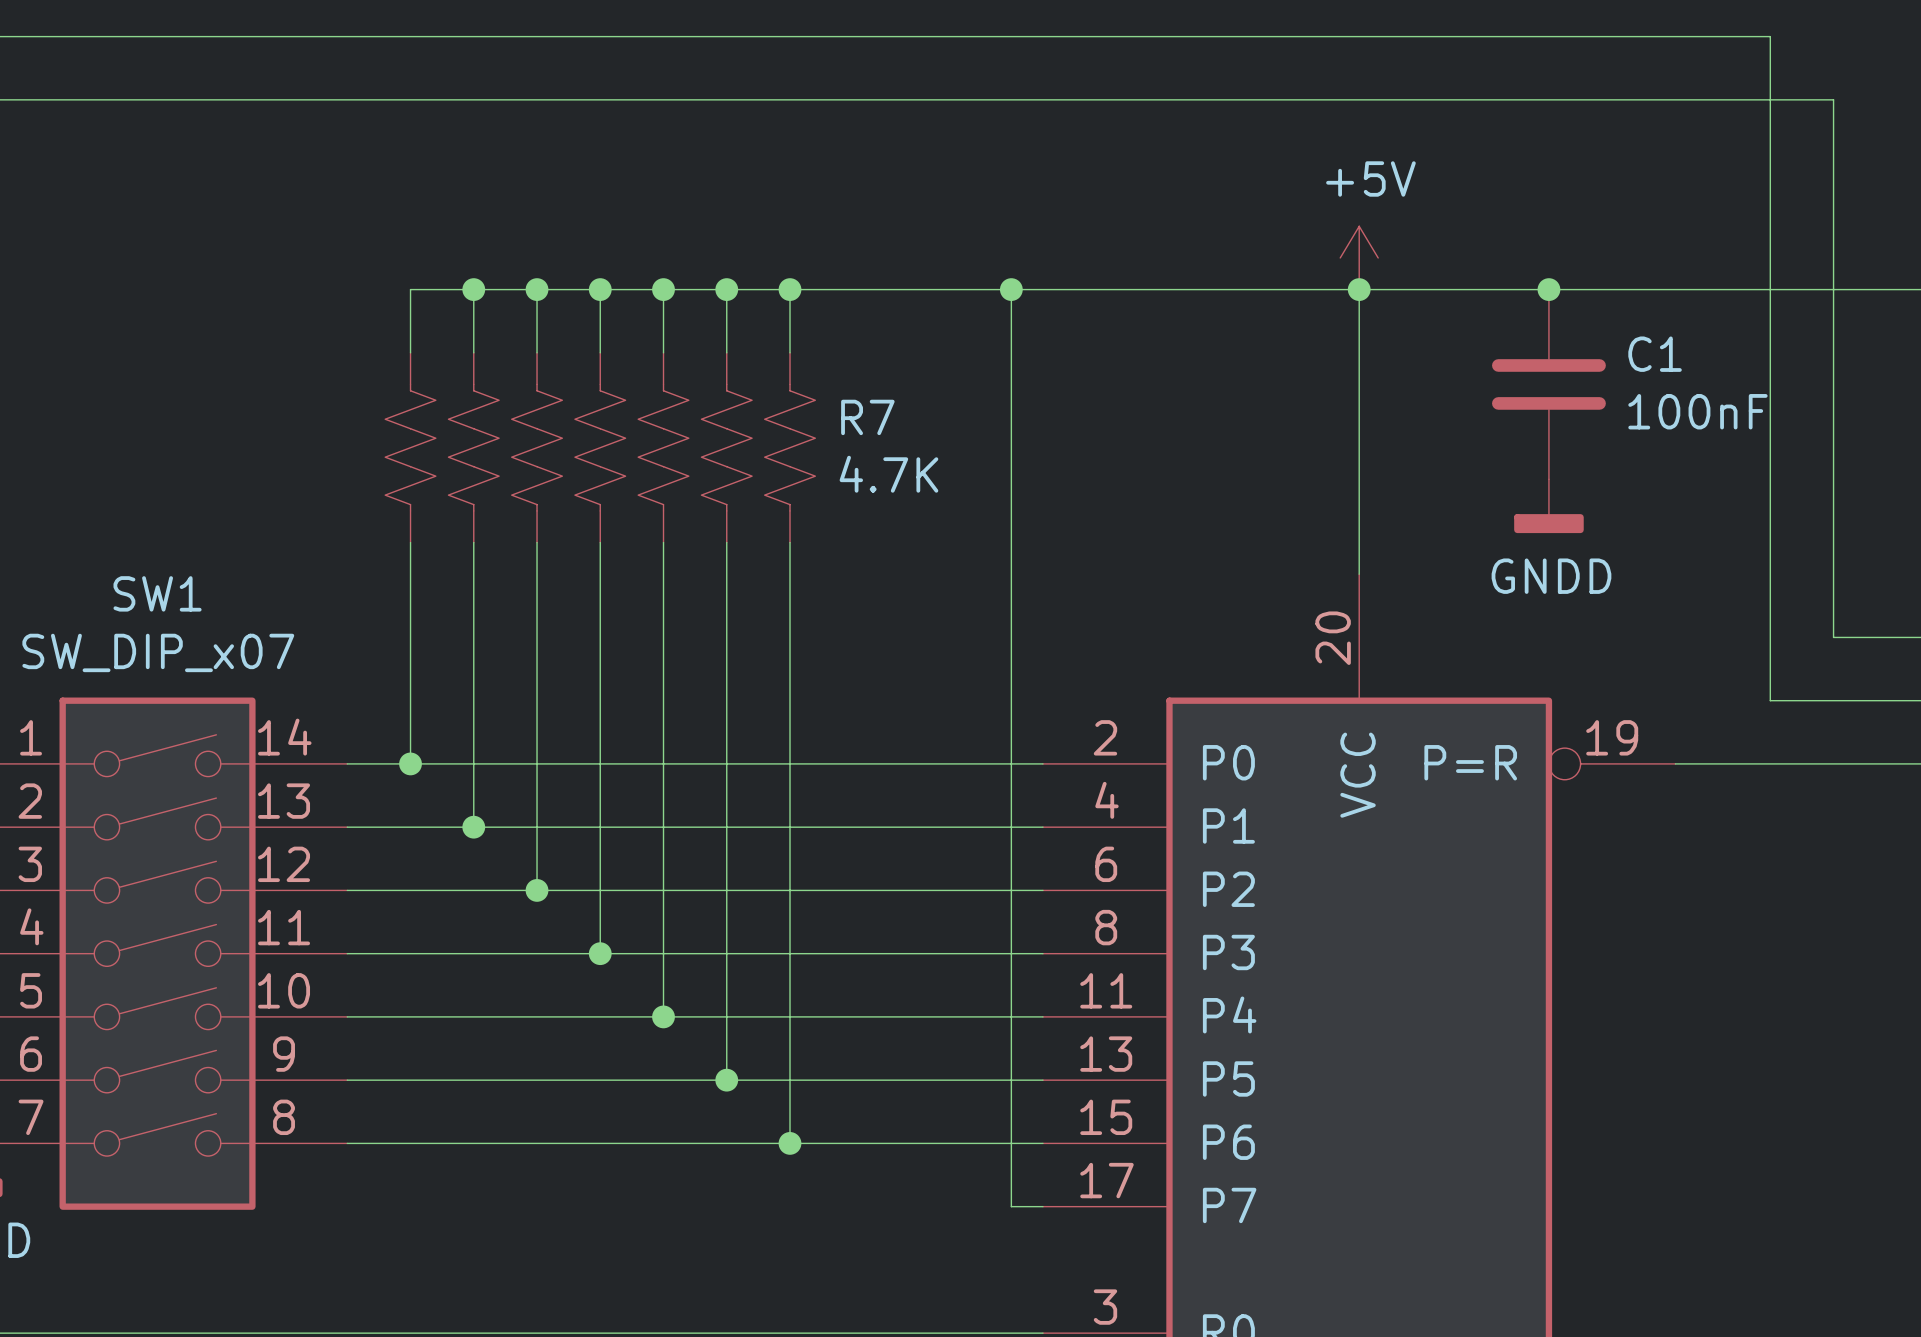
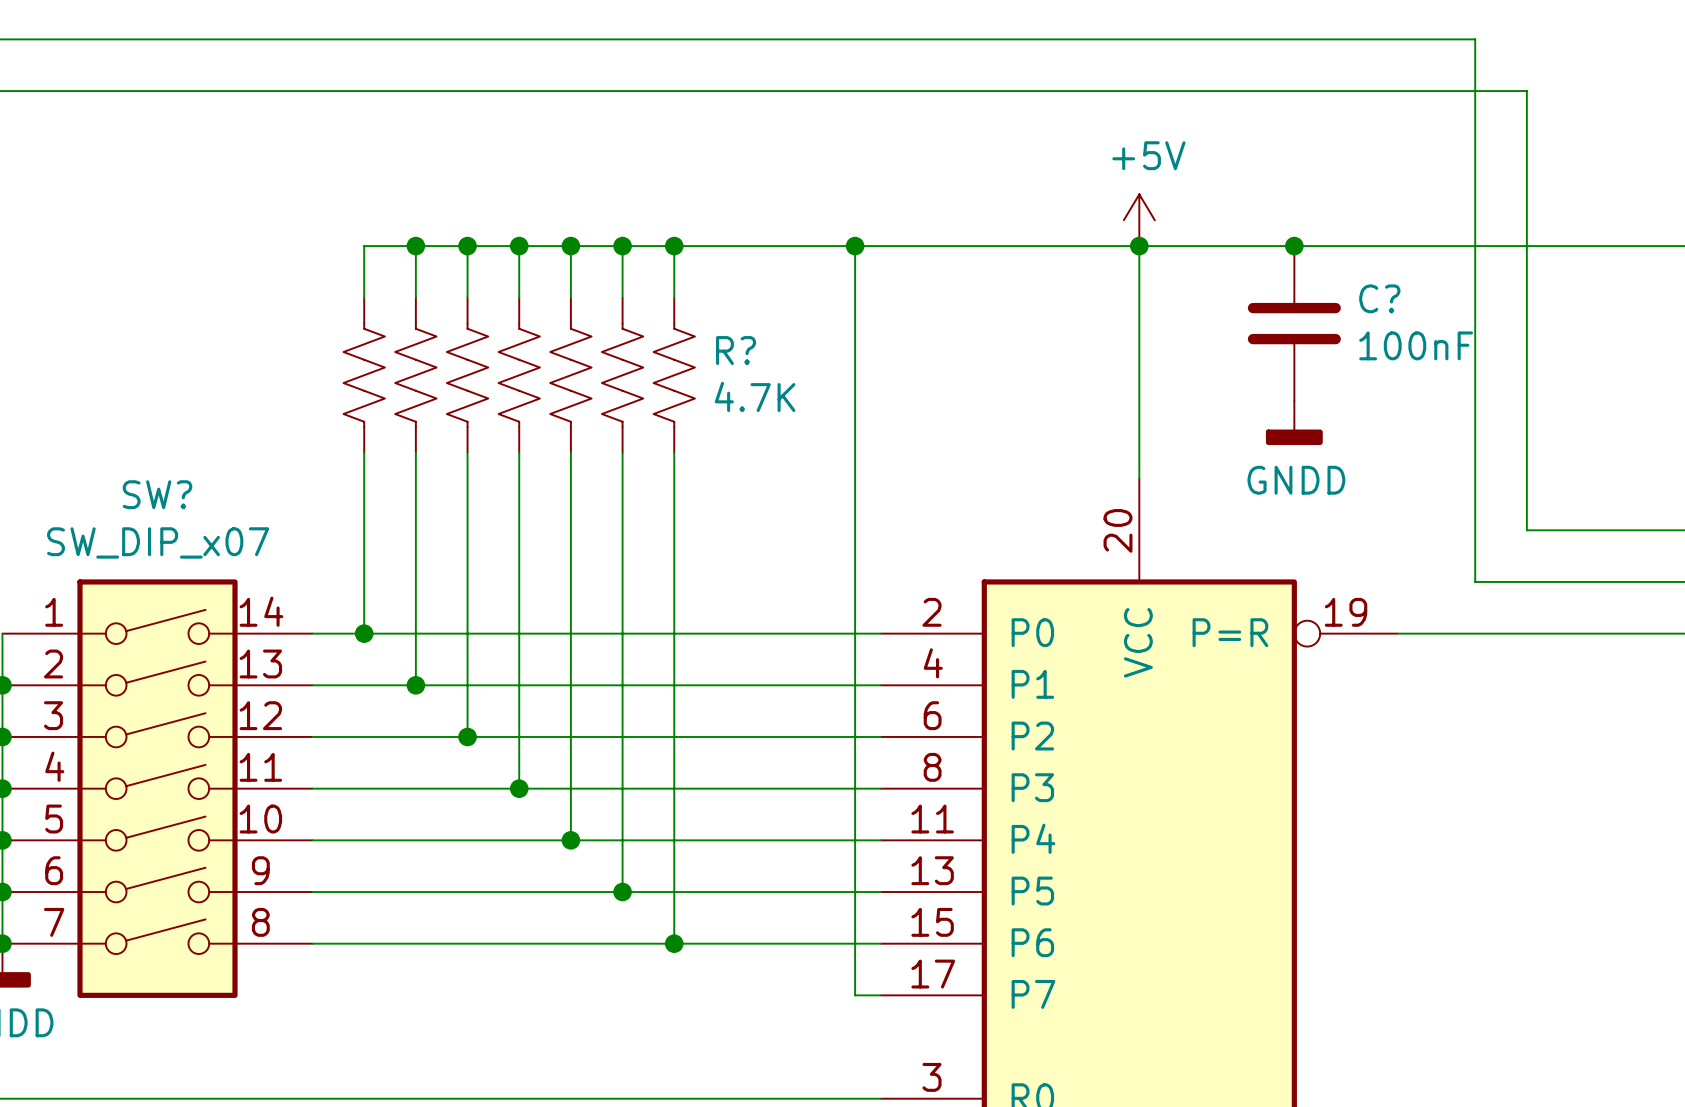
C1 name: C1 (1655, 354) -> C? (1379, 298)
R7 name: R7 (867, 417) -> R? (736, 350)
SW1 name: SW1 (157, 593) -> SW? (157, 494)

